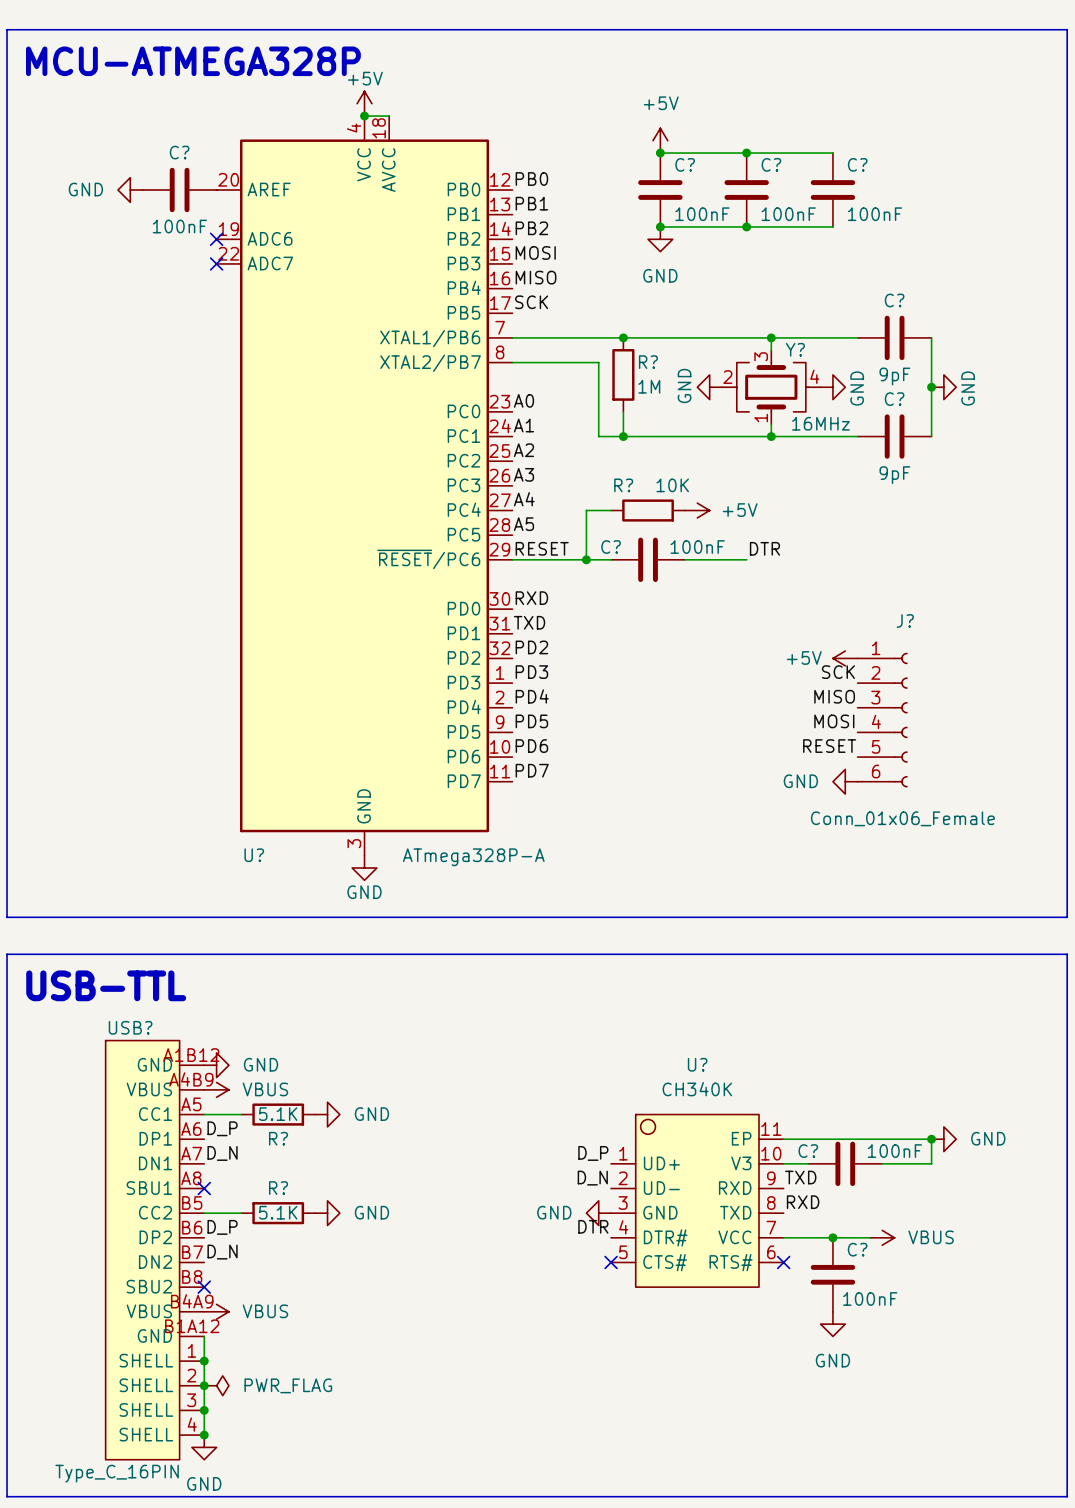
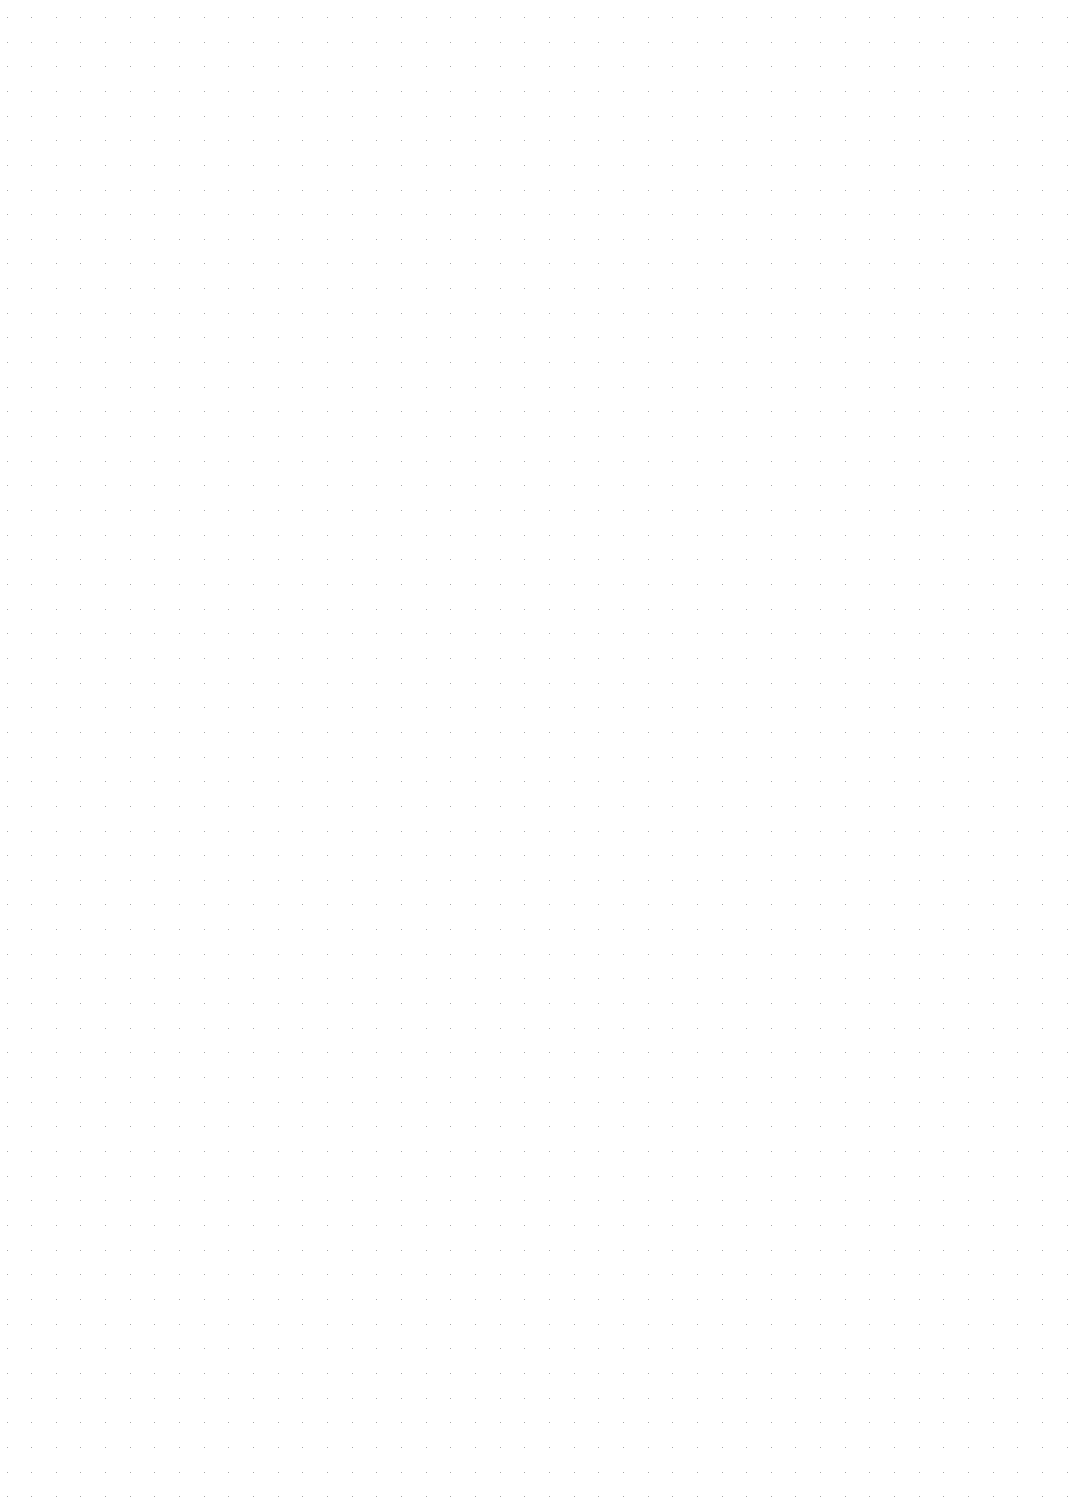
line: (7, 29) (7, 917) (1067, 917) (1067, 29) (7, 29) -> none
text: MCU-ATMEGA328P (193, 61) -> none
power symbol: +5V (364, 103) -> none
wire: (364, 116) (389, 116) -> none
junction: (364, 116) -> none
power symbol: +5V (660, 140) -> none
wire: (660, 153) (832, 153) -> none
junction: (660, 153) -> none
junction: (746, 153) -> none
label: PB0 (531, 179) -> none
power symbol: GND (130, 190) -> none
C?: 100nF (179, 190) -> none
C?: 100nF (660, 190) -> none
C?: 100nF (746, 190) -> none
C?: 100nF (832, 190) -> none
label: PB1 (531, 203) -> none
wire: (660, 226) (832, 226) -> none
junction: (660, 226) -> none
junction: (746, 226) -> none
label: PB2 (531, 228) -> none
no-connect mark: (216, 239) -> none
power symbol: GND (660, 239) -> none
label: MOSI (535, 252) -> none
no-connect mark: (216, 263) -> none
label: MISO (536, 277) -> none
label: SCK (531, 302) -> none
wire: (512, 337) (857, 337) -> none
junction: (623, 337) -> none
wire: (771, 337) (771, 350) -> none
junction: (771, 337) -> none
C?: 9pF (894, 337) -> none
wire: (931, 337) (931, 436) -> none
wire: (512, 362) (598, 362) (598, 436) (857, 436) -> none
R?: 1M (623, 374) -> none
power symbol: GND (709, 387) -> none
Y?: 16MHz (771, 387) -> none
power symbol: GND (832, 387) -> none
junction: (931, 387) -> none
power symbol: GND (943, 387) -> none
label: A0 (523, 400) -> none
wire: (623, 411) (623, 436) -> none
wire: (771, 424) (771, 436) -> none
label: A1 (523, 425) -> none
junction: (623, 436) -> none
junction: (771, 436) -> none
C?: 9pF (894, 436) -> none
label: A2 (523, 450) -> none
label: A3 (523, 474) -> none
U?: ATmega328P-A (364, 485) -> none
label: A4 (524, 499) -> none
wire: (611, 510) (586, 510) (586, 559) -> none
R?: 10K (648, 510) -> none
power symbol: +5V (697, 510) -> none
label: A5 (523, 524) -> none
label: RESET (542, 548) -> none
label: DTR (764, 548) -> none
wire: (512, 559) (611, 559) -> none
junction: (586, 559) -> none
C?: 100nF (648, 559) -> none
wire: (685, 559) (746, 559) -> none
label: RXD (531, 598) -> none
label: TXD (529, 622) -> none
label: PD2 (531, 647) -> none
power symbol: +5V (845, 658) -> none
label: PD3 (531, 672) -> none
label: SCK (838, 672) -> none
label: PD4 (532, 696) -> none
label: MISO (834, 696) -> none
J?: Conn_01x06_Female (882, 720) -> none
label: PD5 (531, 721) -> none
label: MOSI (834, 721) -> none
label: PD6 (531, 746) -> none
label: RESET (829, 746) -> none
label: PD7 (532, 770) -> none
power symbol: GND (845, 781) -> none
power symbol: GND (364, 868) -> none
line: (7, 954) (7, 1496) (1067, 1496) (1067, 954) (7, 954) -> none
text: USB-TTL (106, 985) -> none
power symbol: GND (216, 1065) -> none
power symbol: VBUS (216, 1089) -> none
wire: (204, 1114) (241, 1114) -> none
R?: 5.1K (278, 1114) -> none
power symbol: GND (327, 1114) -> none
label: D_P (222, 1128) -> none
wire: (783, 1139) (931, 1139) (931, 1163) (882, 1163) -> none
junction: (931, 1139) -> none
power symbol: GND (943, 1139) -> none
label: D_N (222, 1153) -> none
label: D_P (593, 1153) -> none
wire: (783, 1163) (808, 1163) -> none
C?: 100nF (845, 1163) -> none
label: TXD (800, 1177) -> none
label: D_N (592, 1178) -> none
no-connect mark: (204, 1188) -> none
U?: CH340K (697, 1200) -> none
label: RXD (803, 1202) -> none
wire: (204, 1213) (241, 1213) -> none
R?: 5.1K (278, 1213) -> none
power symbol: GND (327, 1213) -> none
power symbol: GND (598, 1213) -> none
label: DTR (593, 1226) -> none
label: D_P (222, 1227) -> none
wire: (783, 1237) (869, 1237) -> none
junction: (832, 1237) -> none
power symbol: VBUS (882, 1237) -> none
USB?: Type_C_16PIN (105, 1250) -> none
label: D_N (222, 1252) -> none
no-connect mark: (611, 1262) -> none
no-connect mark: (783, 1262) -> none
C?: 100nF (832, 1274) -> none
no-connect mark: (204, 1287) -> none
power symbol: VBUS (216, 1311) -> none
power symbol: GND (832, 1324) -> none
wire: (204, 1336) (204, 1435) -> none
junction: (204, 1361) -> none
junction: (204, 1385) -> none
power symbol: PWR_FLAG (216, 1385) -> none
junction: (204, 1410) -> none
junction: (204, 1435) -> none
power symbol: GND (204, 1447) -> none

